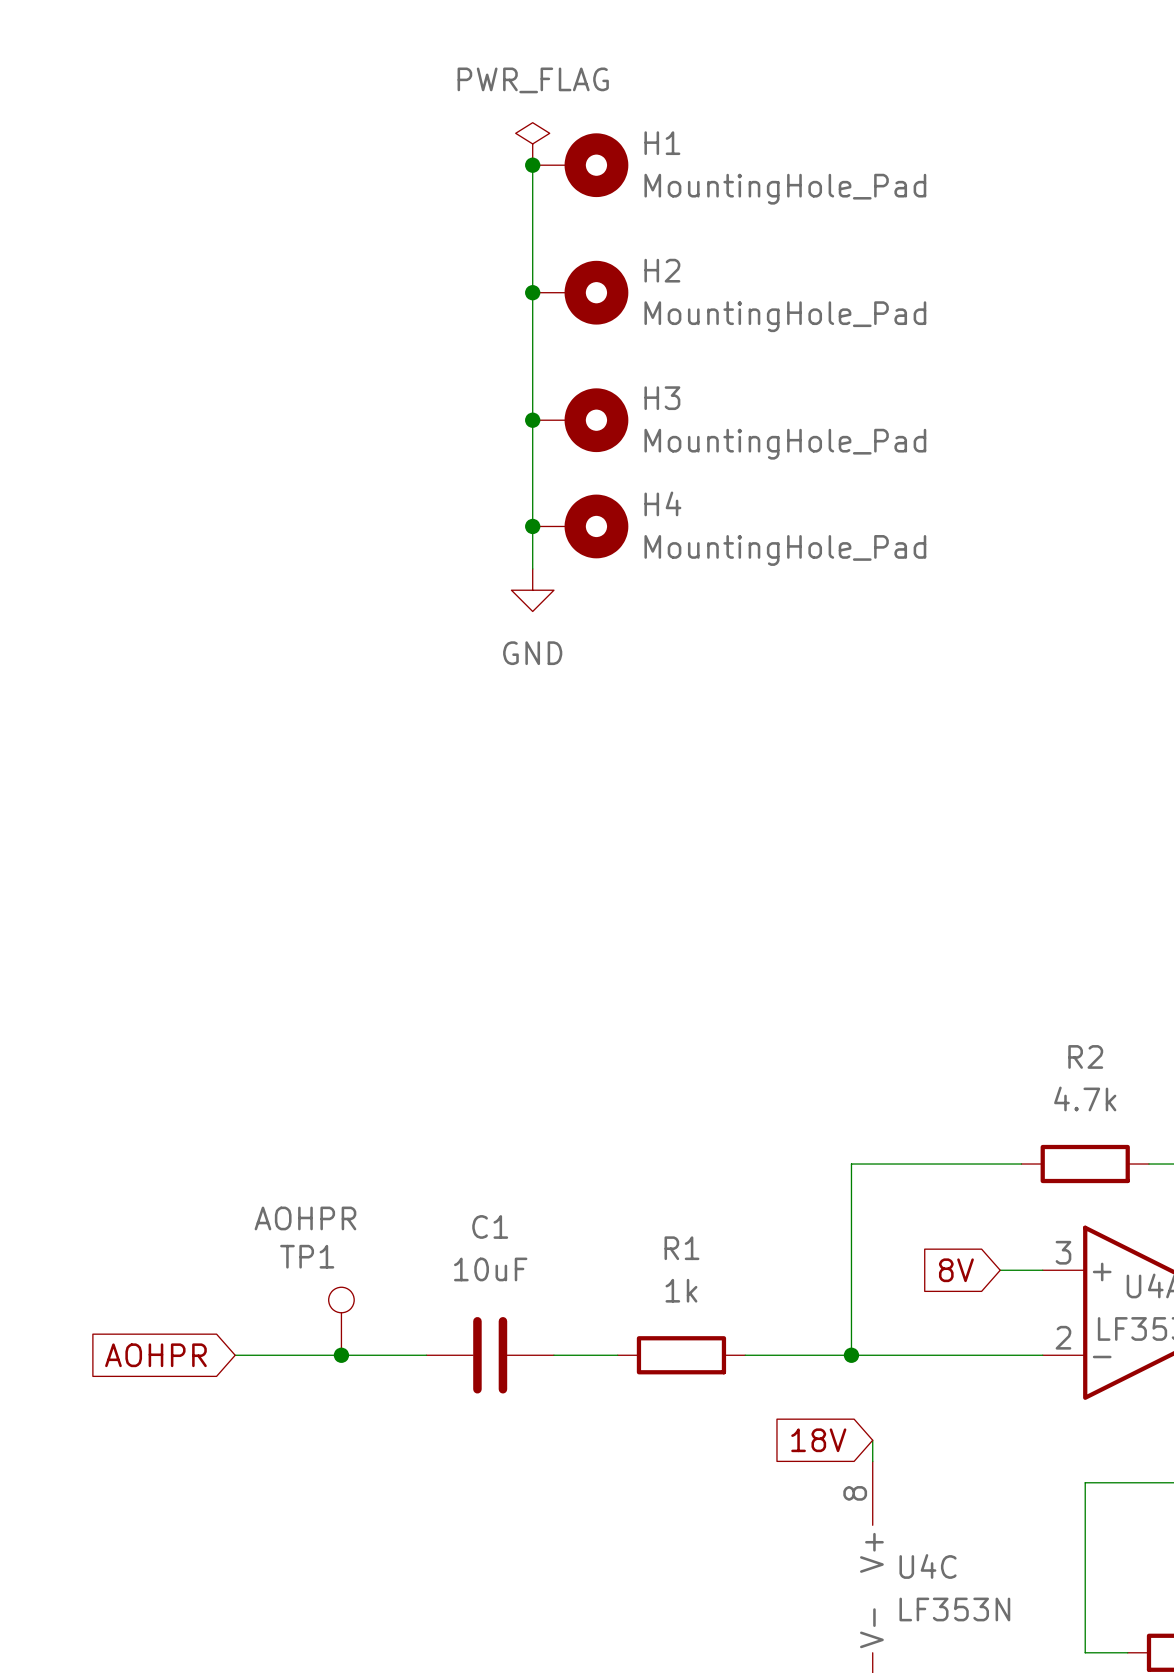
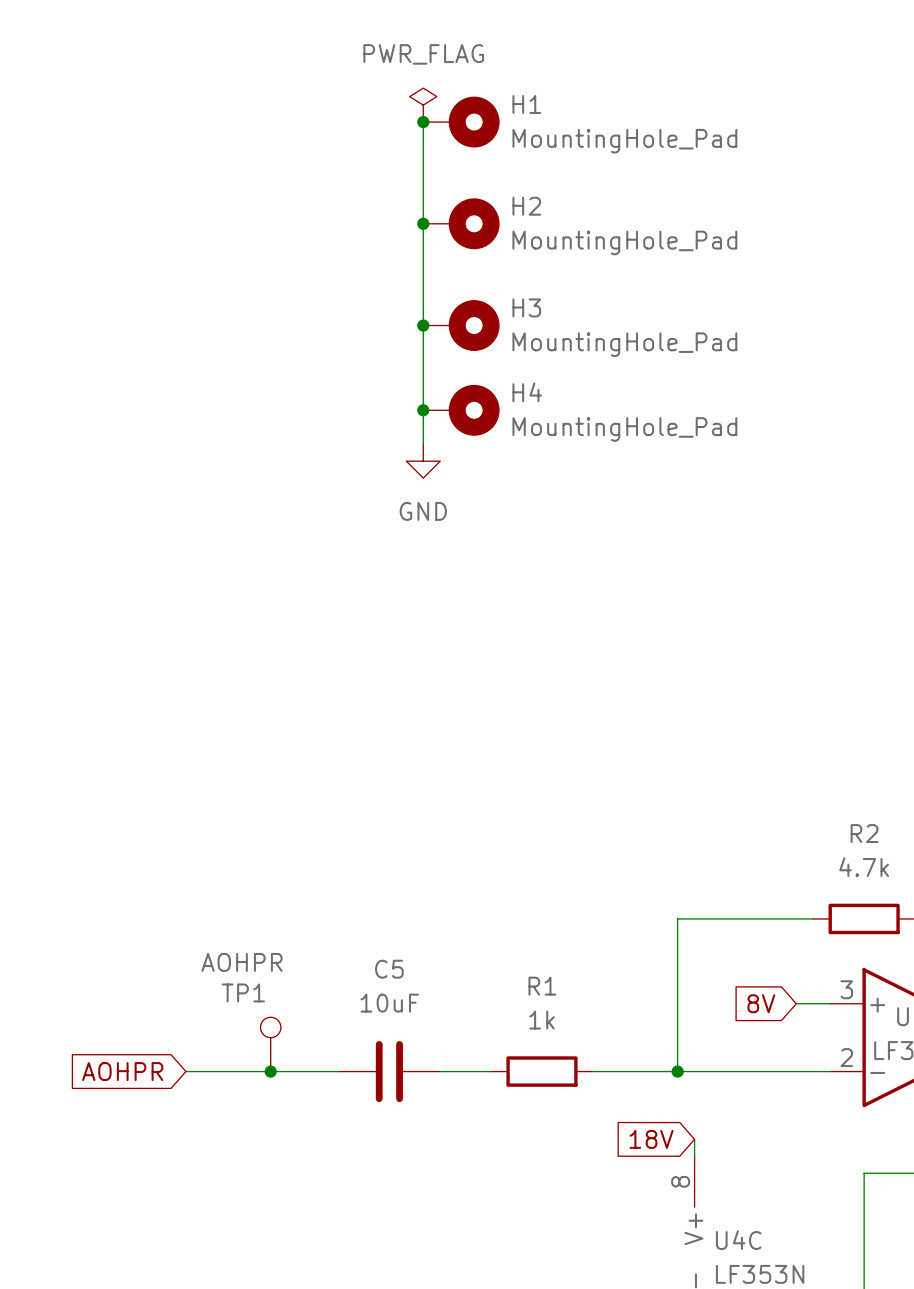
C1 name: C1 (490, 1226) -> C5 (389, 969)

